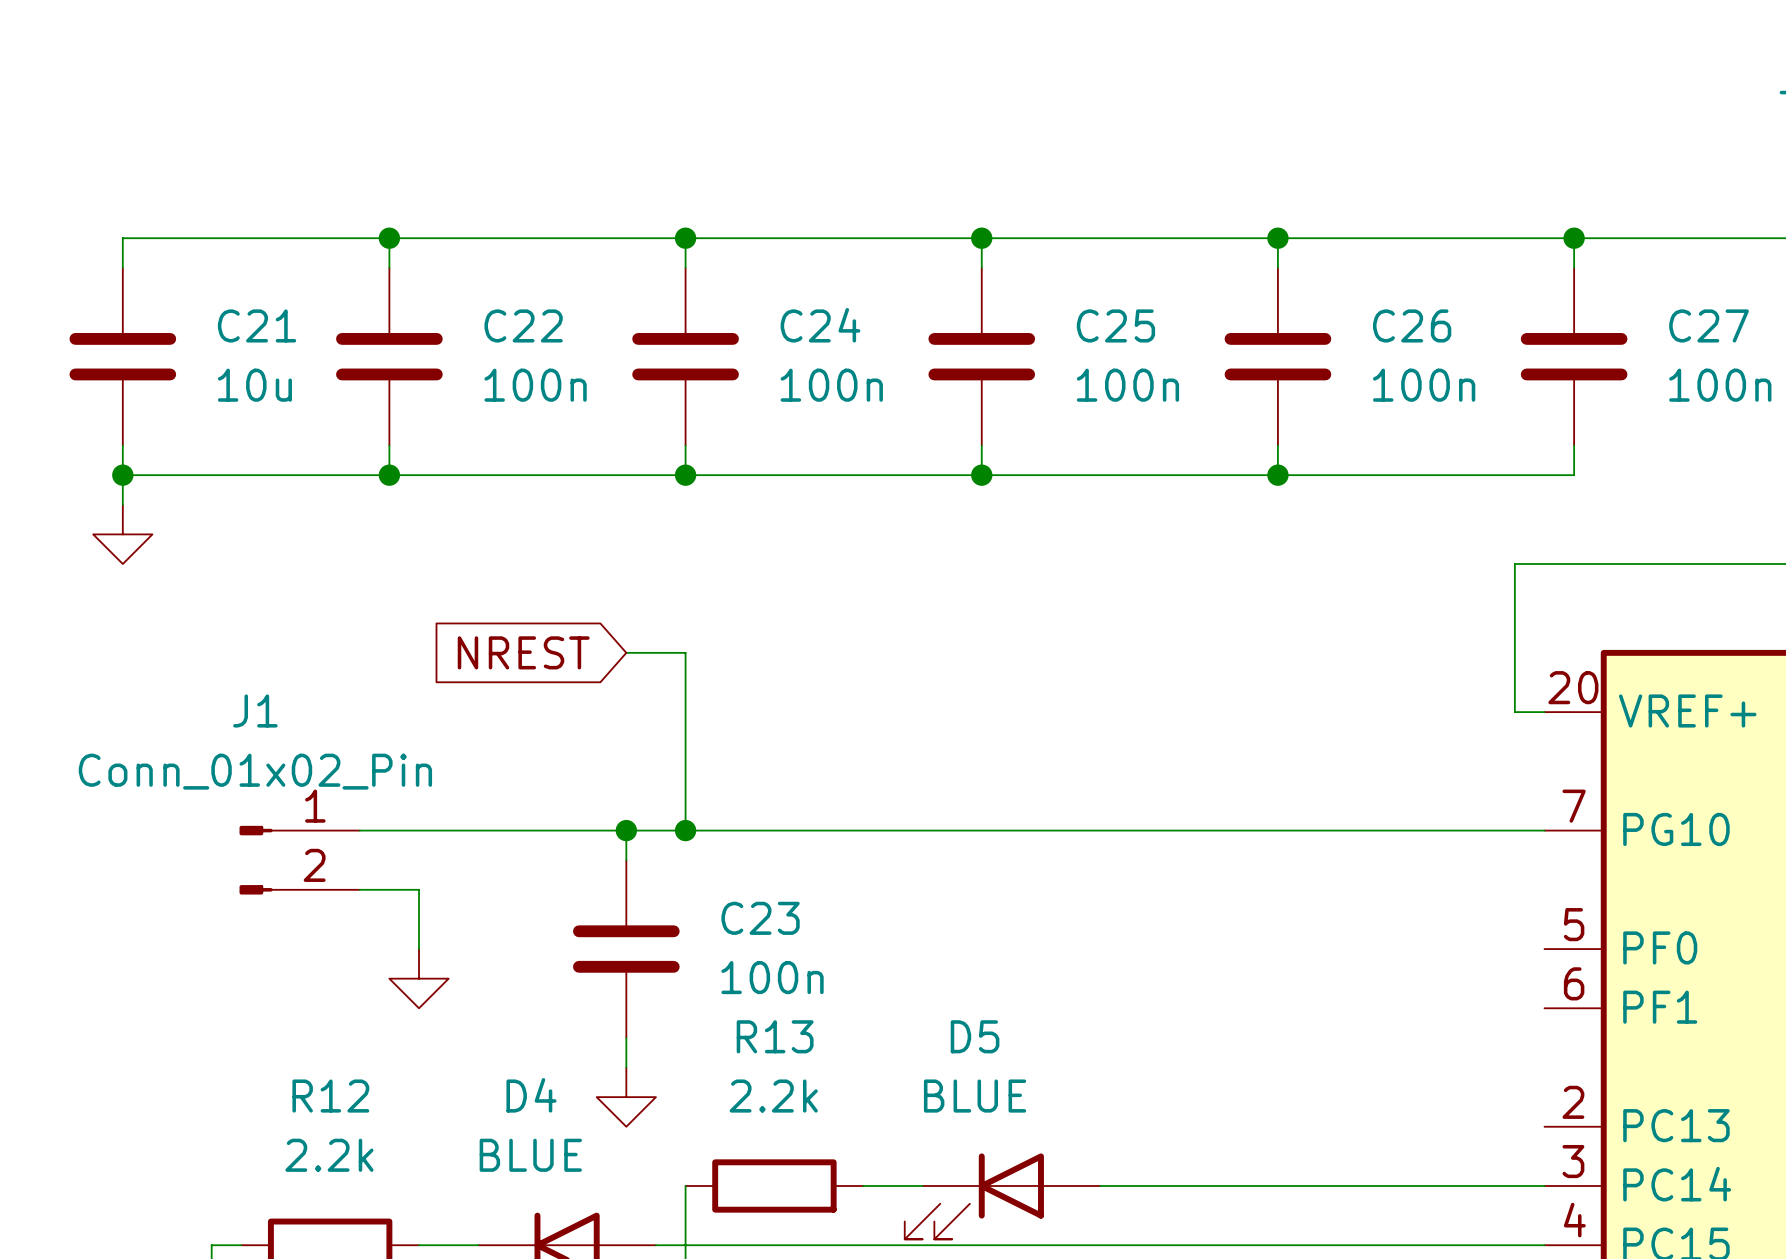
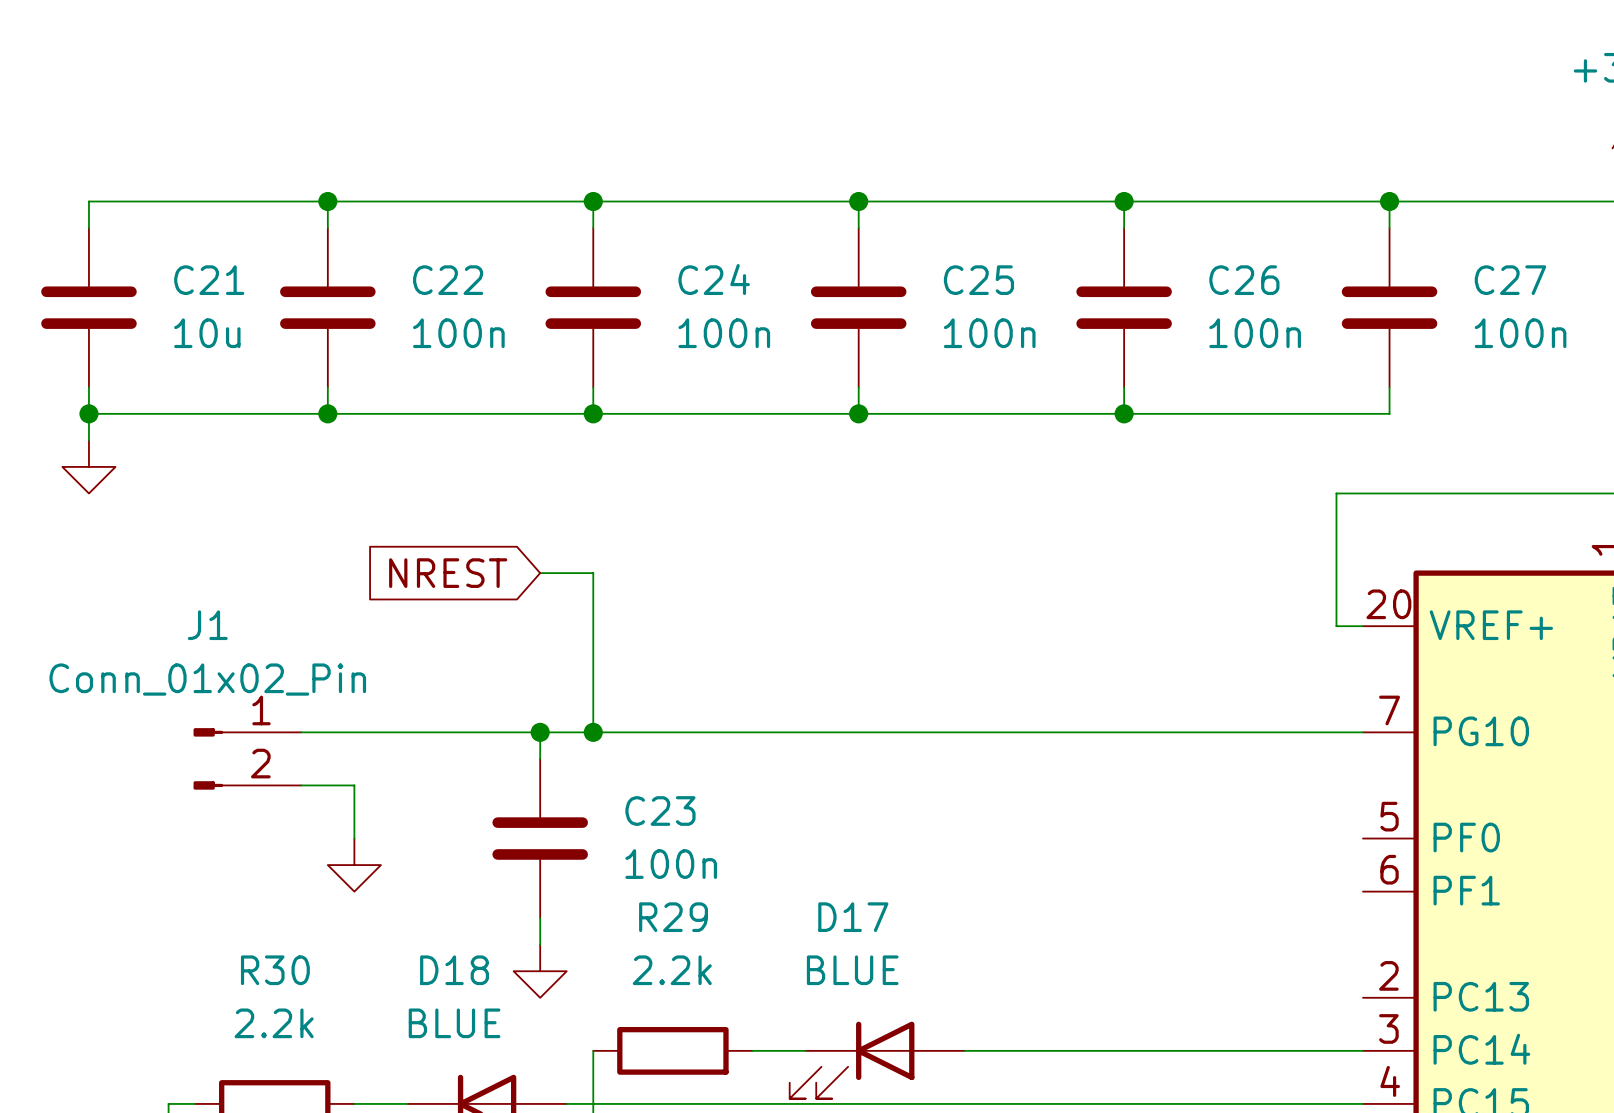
R13 name: R13 (775, 1036) -> R29 (673, 917)
D5 name: D5 (975, 1036) -> D17 (853, 917)
D4 name: D4 (531, 1095) -> D18 (454, 970)
R12 name: R12 (330, 1096) -> R30 (275, 970)

